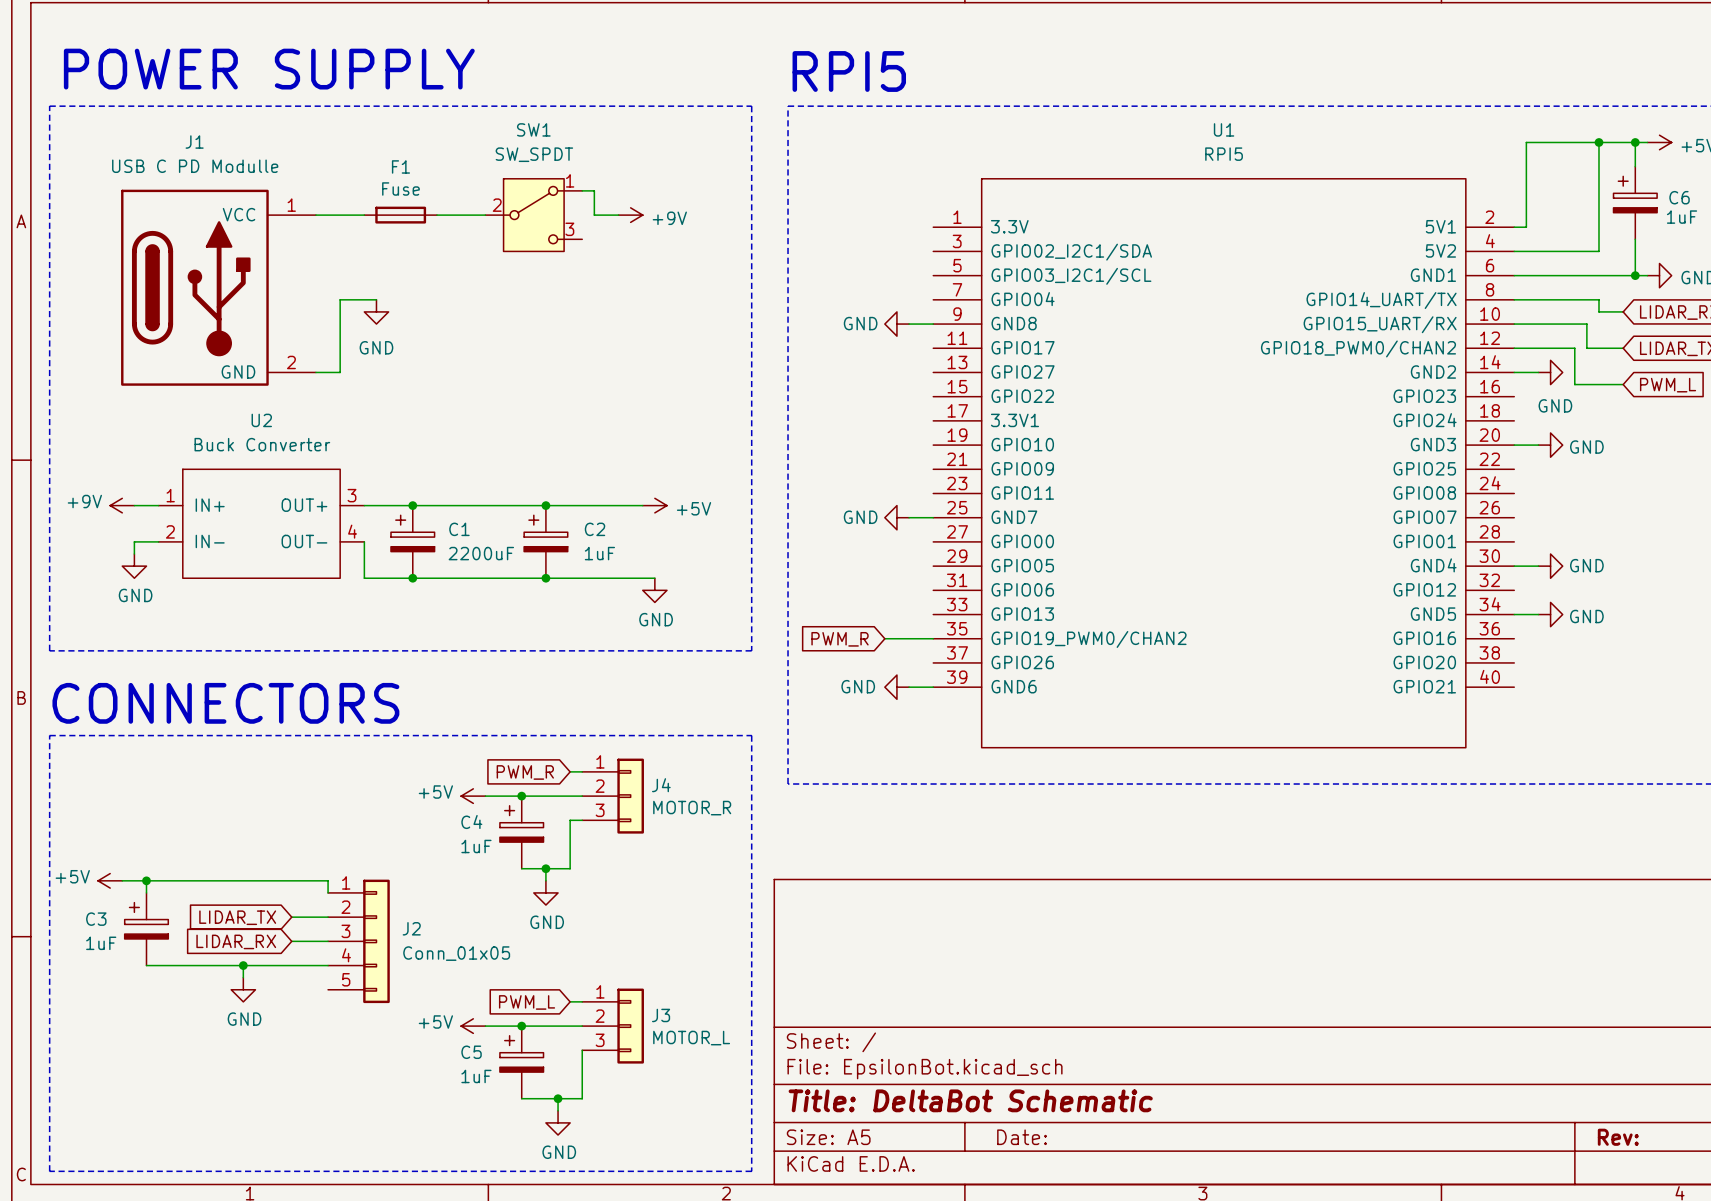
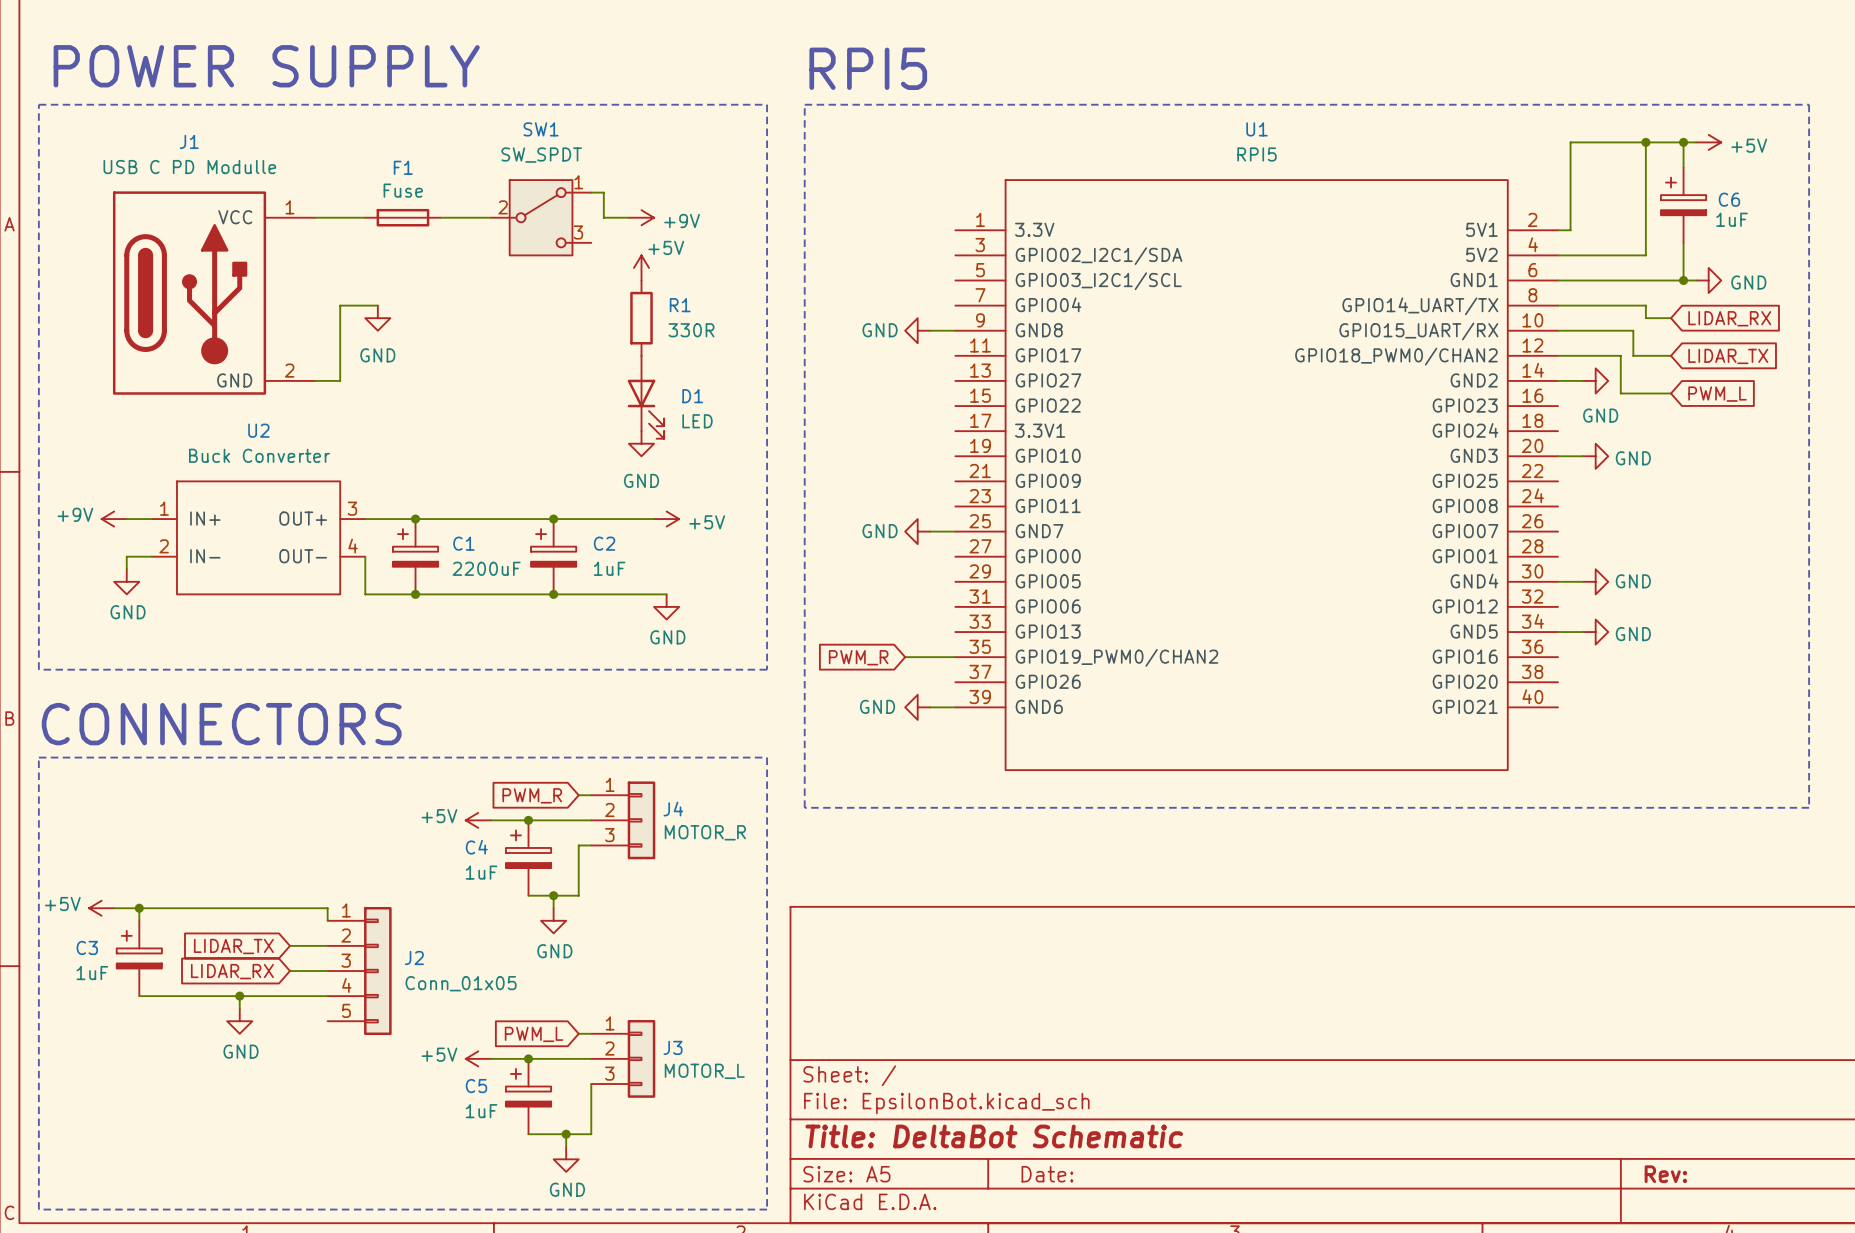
power symbol: none -> +5V (641, 267)
R1: none -> 330R (641, 318)
D1: none -> LED (645, 397)
power symbol: none -> GND (641, 443)

